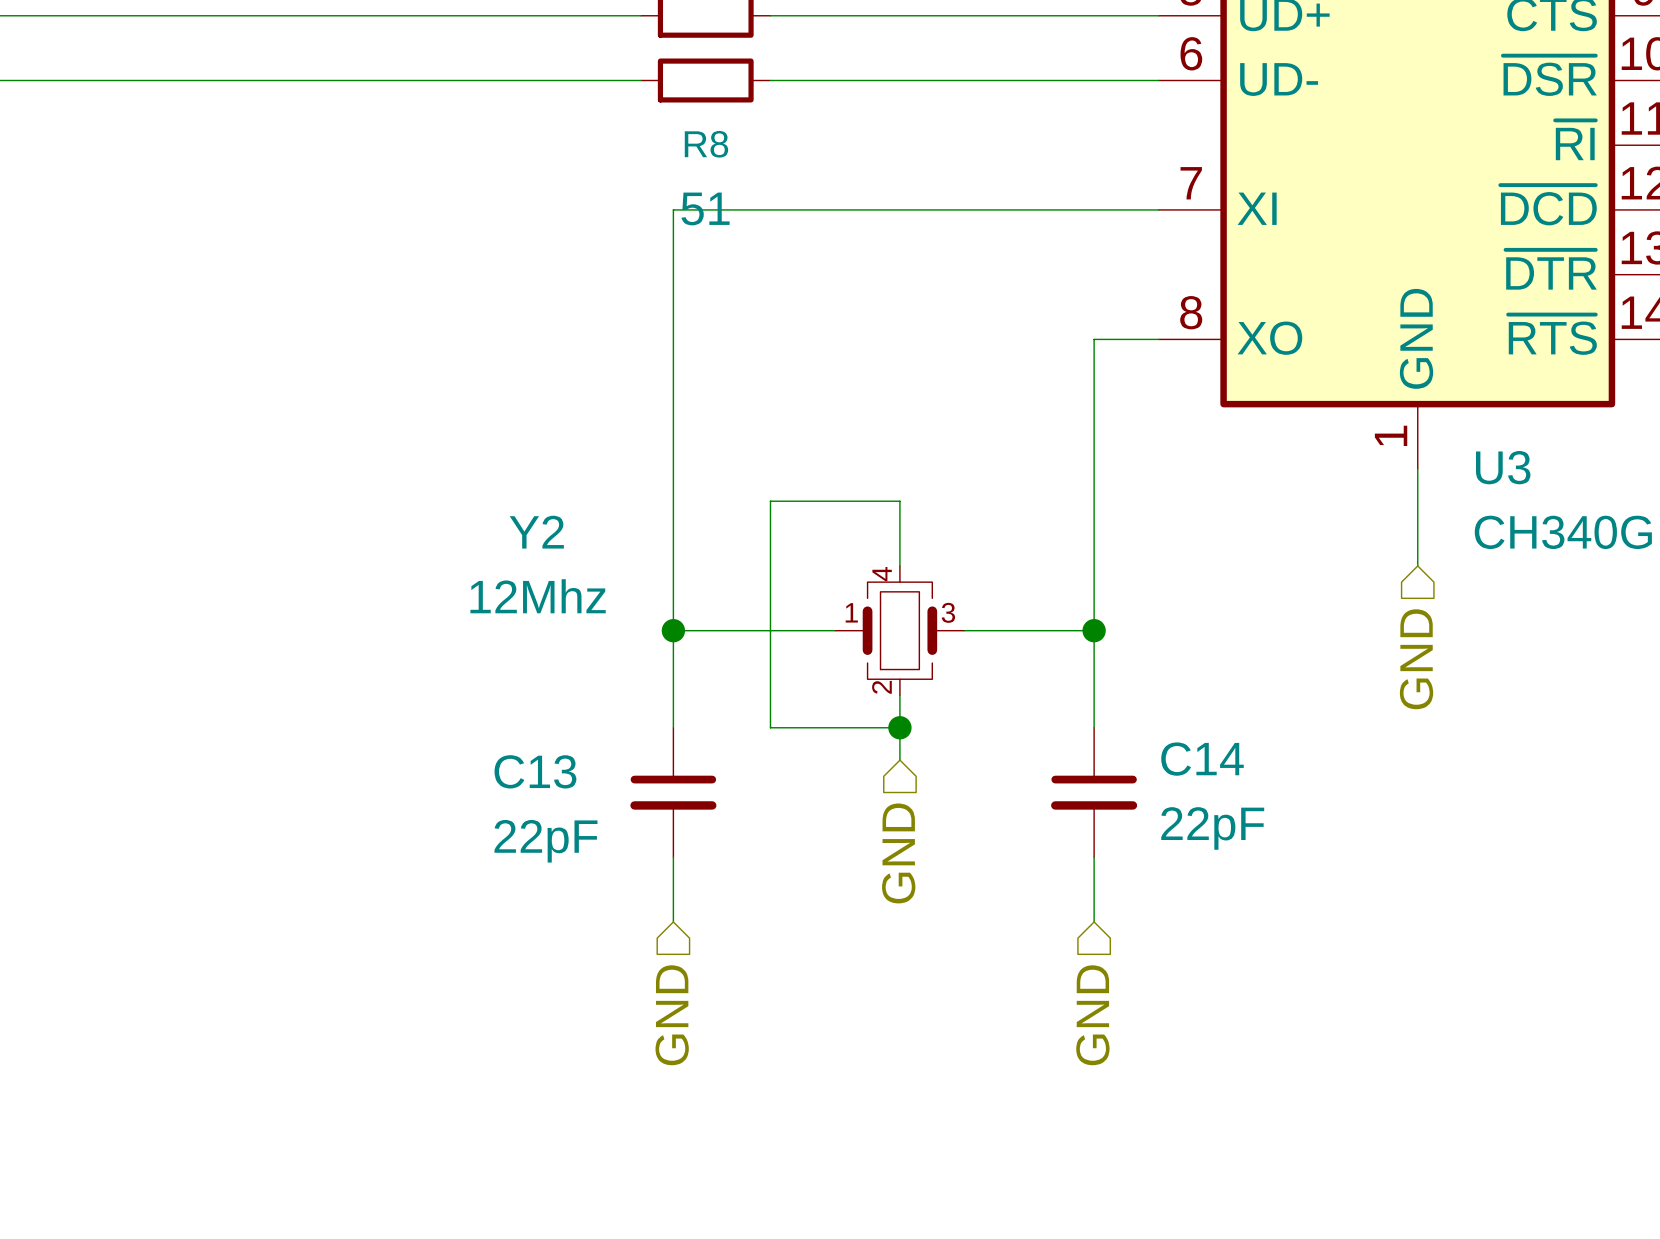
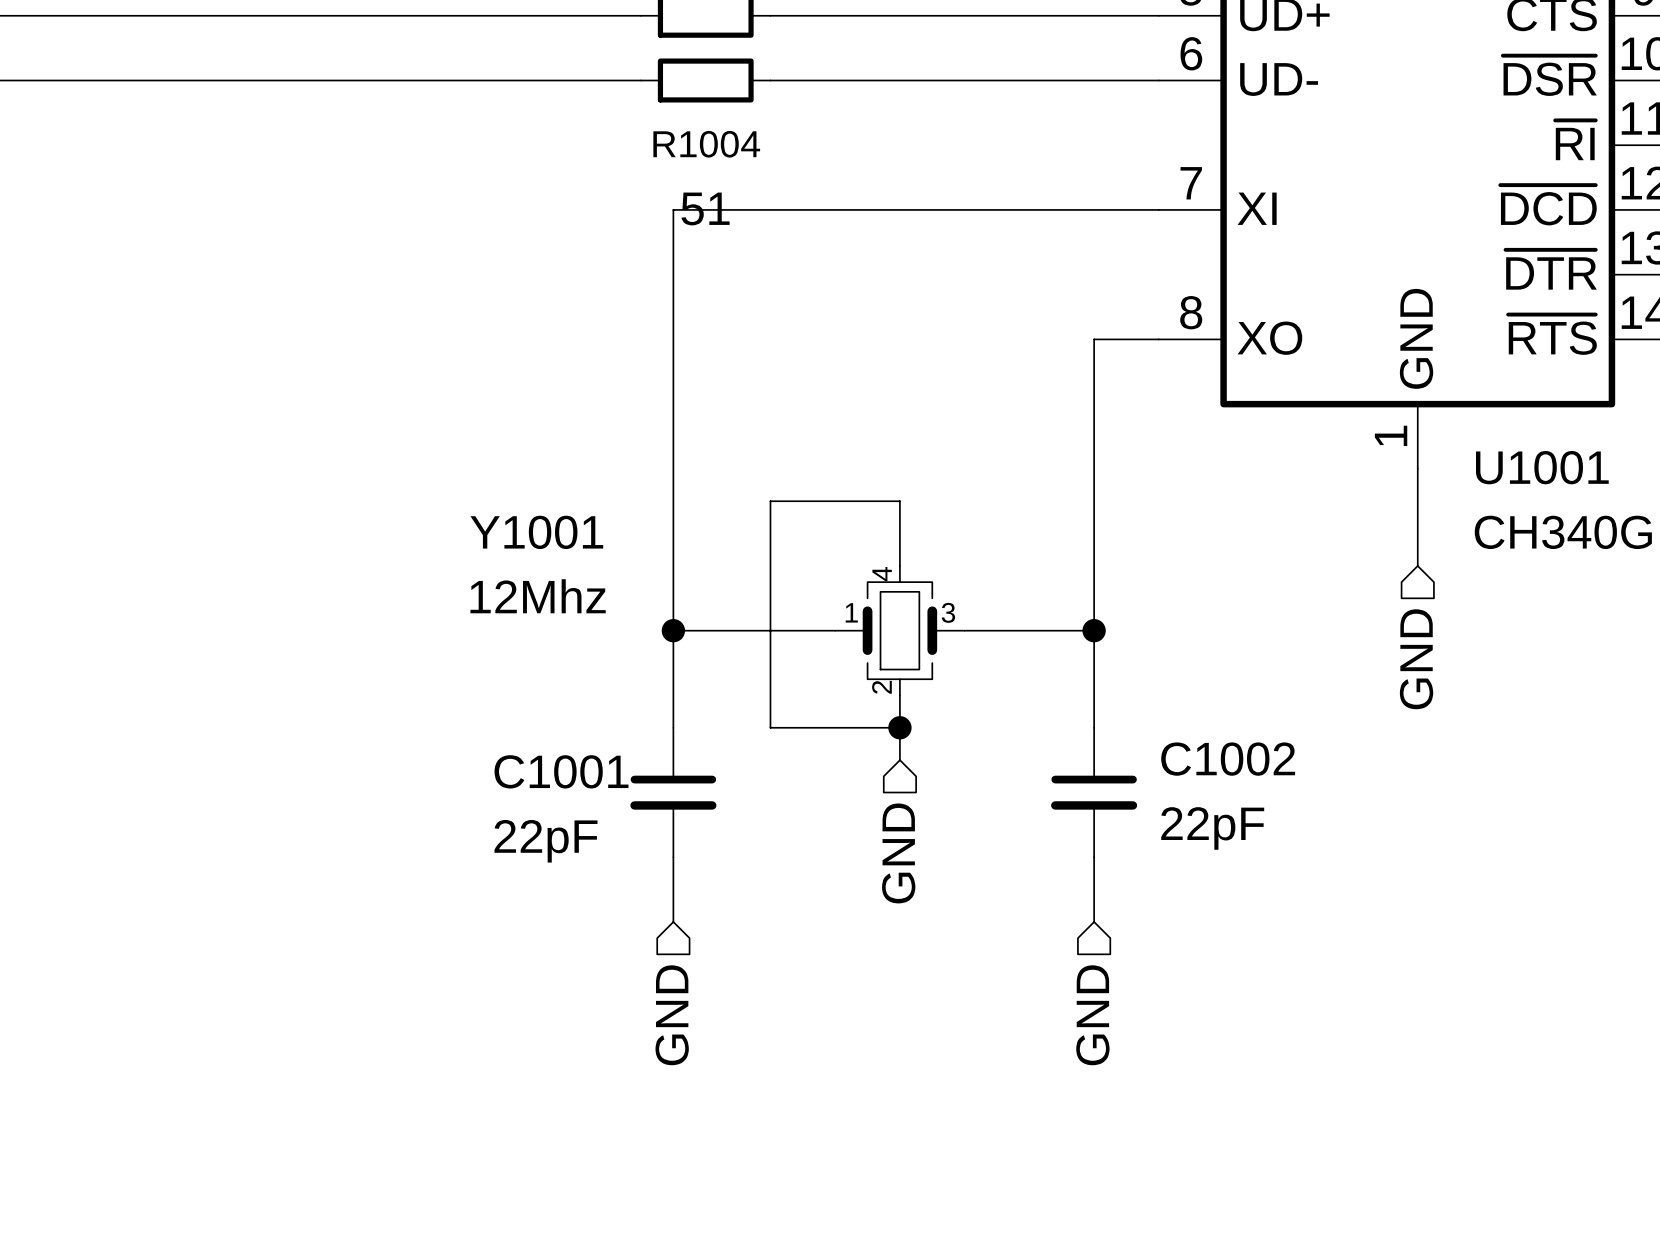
R8 name: R8 (706, 144) -> R1004 (706, 144)
U3 name: U3 (1503, 467) -> U1001 (1542, 467)
Y2 name: Y2 (536, 532) -> Y1001 (536, 532)
C14 name: C14 (1202, 759) -> C1002 (1228, 759)
C13 name: C13 (535, 771) -> C1001 (561, 771)

